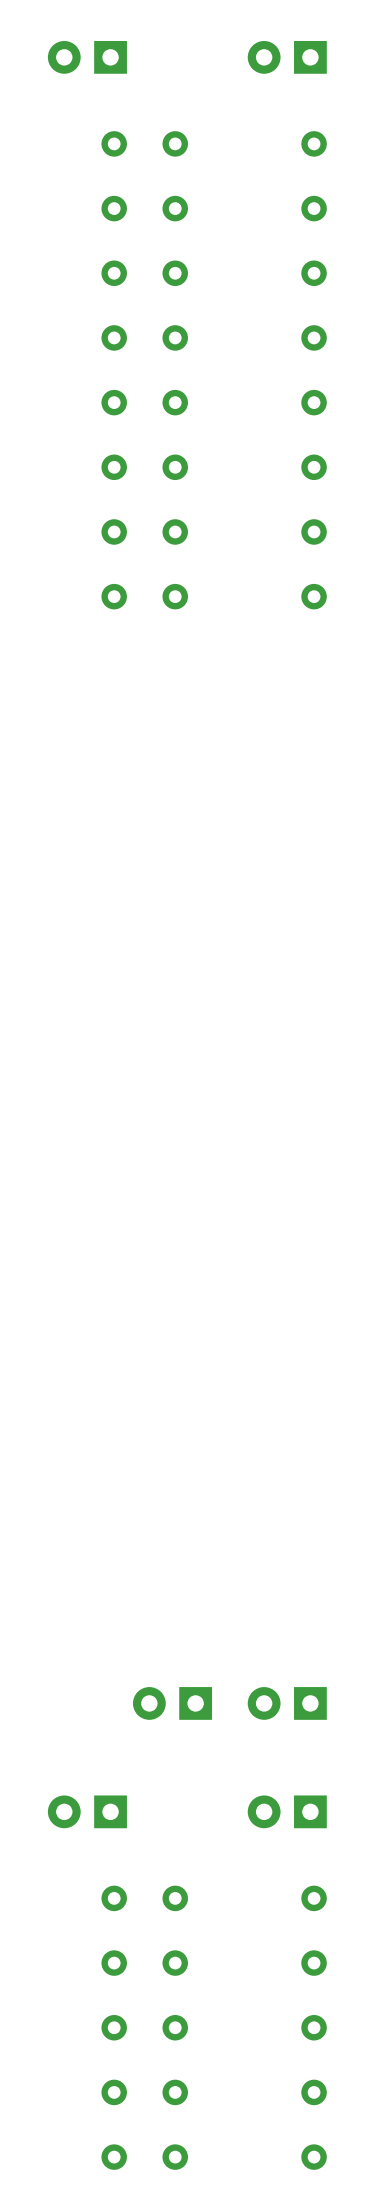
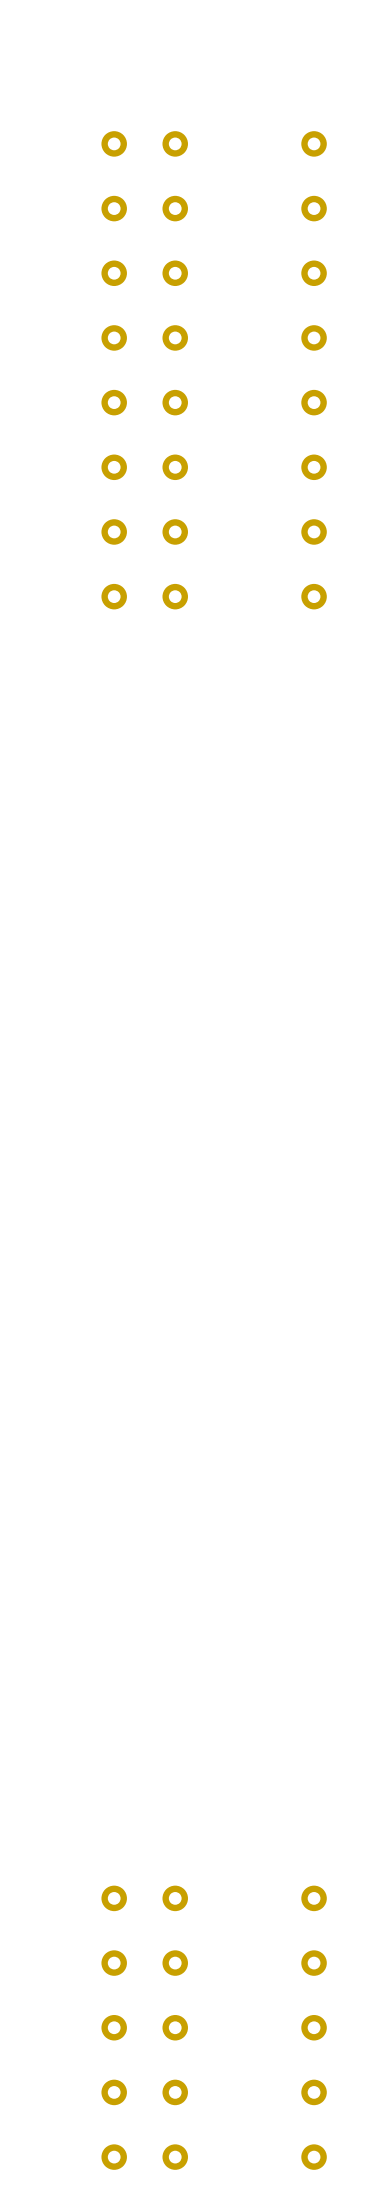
part: (87, 57) -> none
part: (287, 57) -> none
part: (172, 1703) -> none
part: (287, 1703) -> none
part: (87, 1811) -> none
part: (287, 1811) -> none

